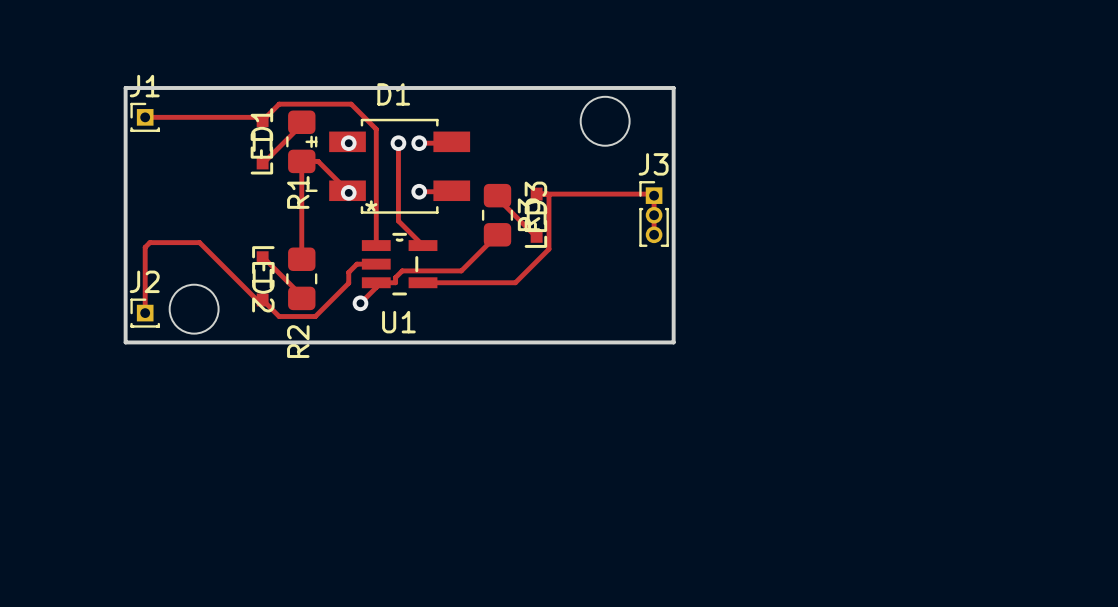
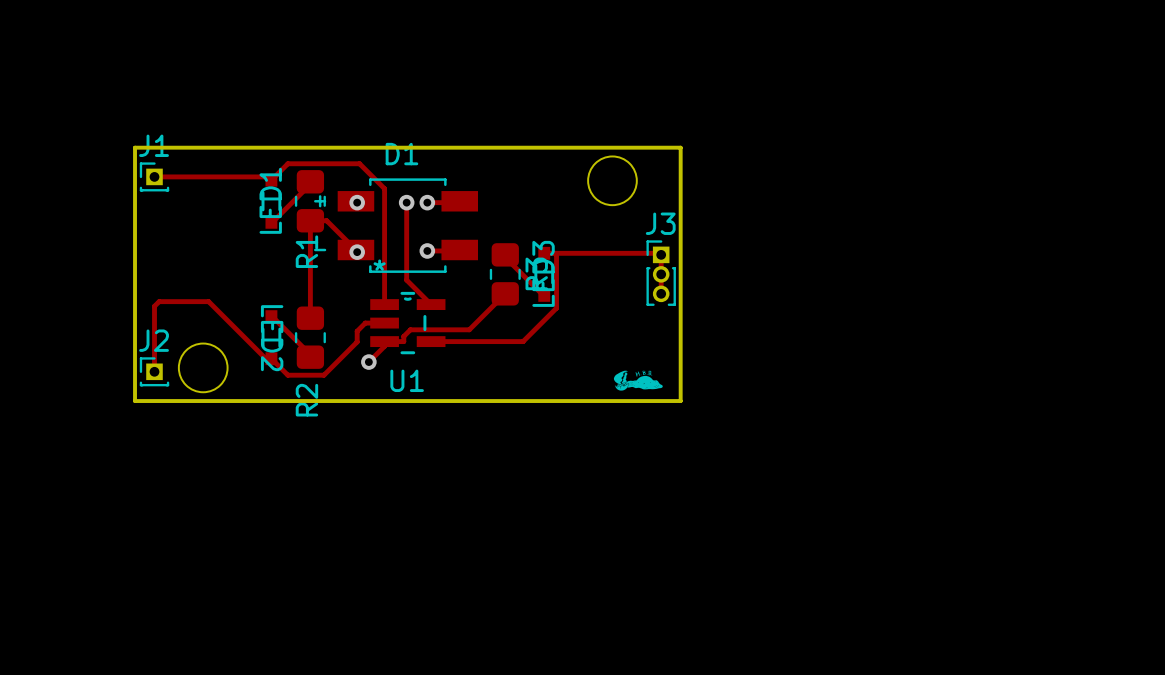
drawing: none -> [613, 370, 663, 391]

